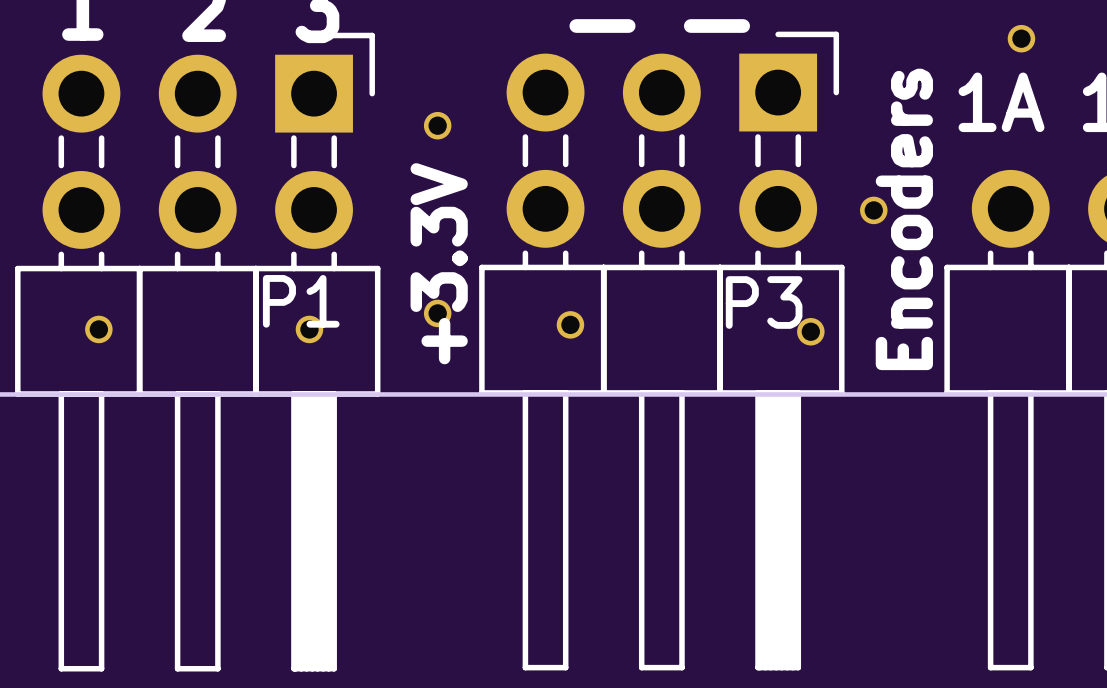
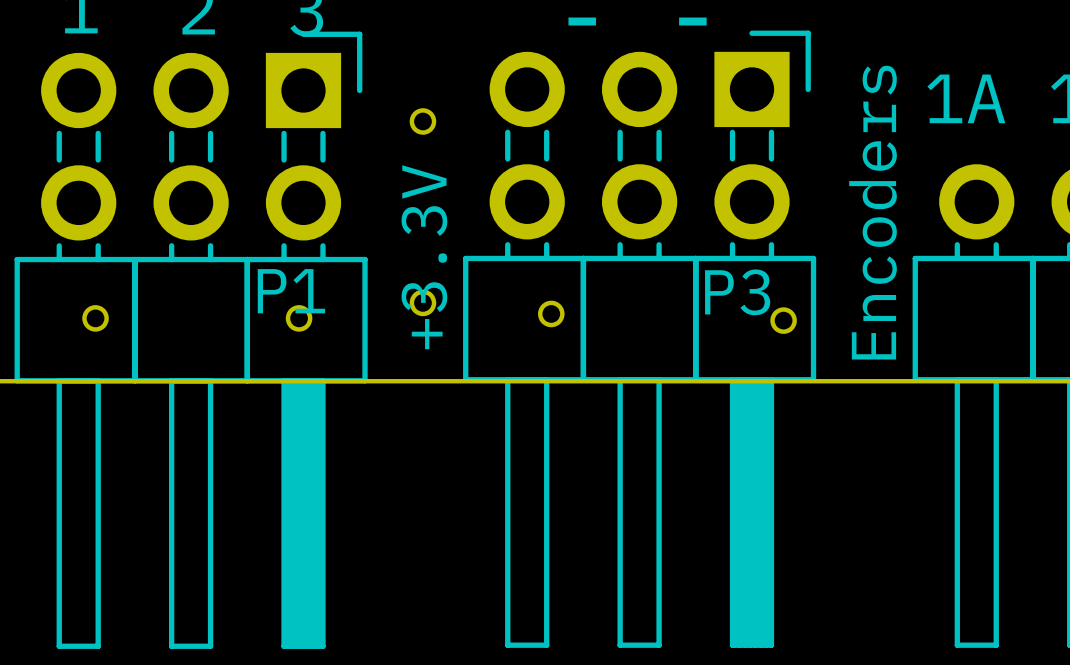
part: (1021, 38) -> none
part: (873, 210) -> none

